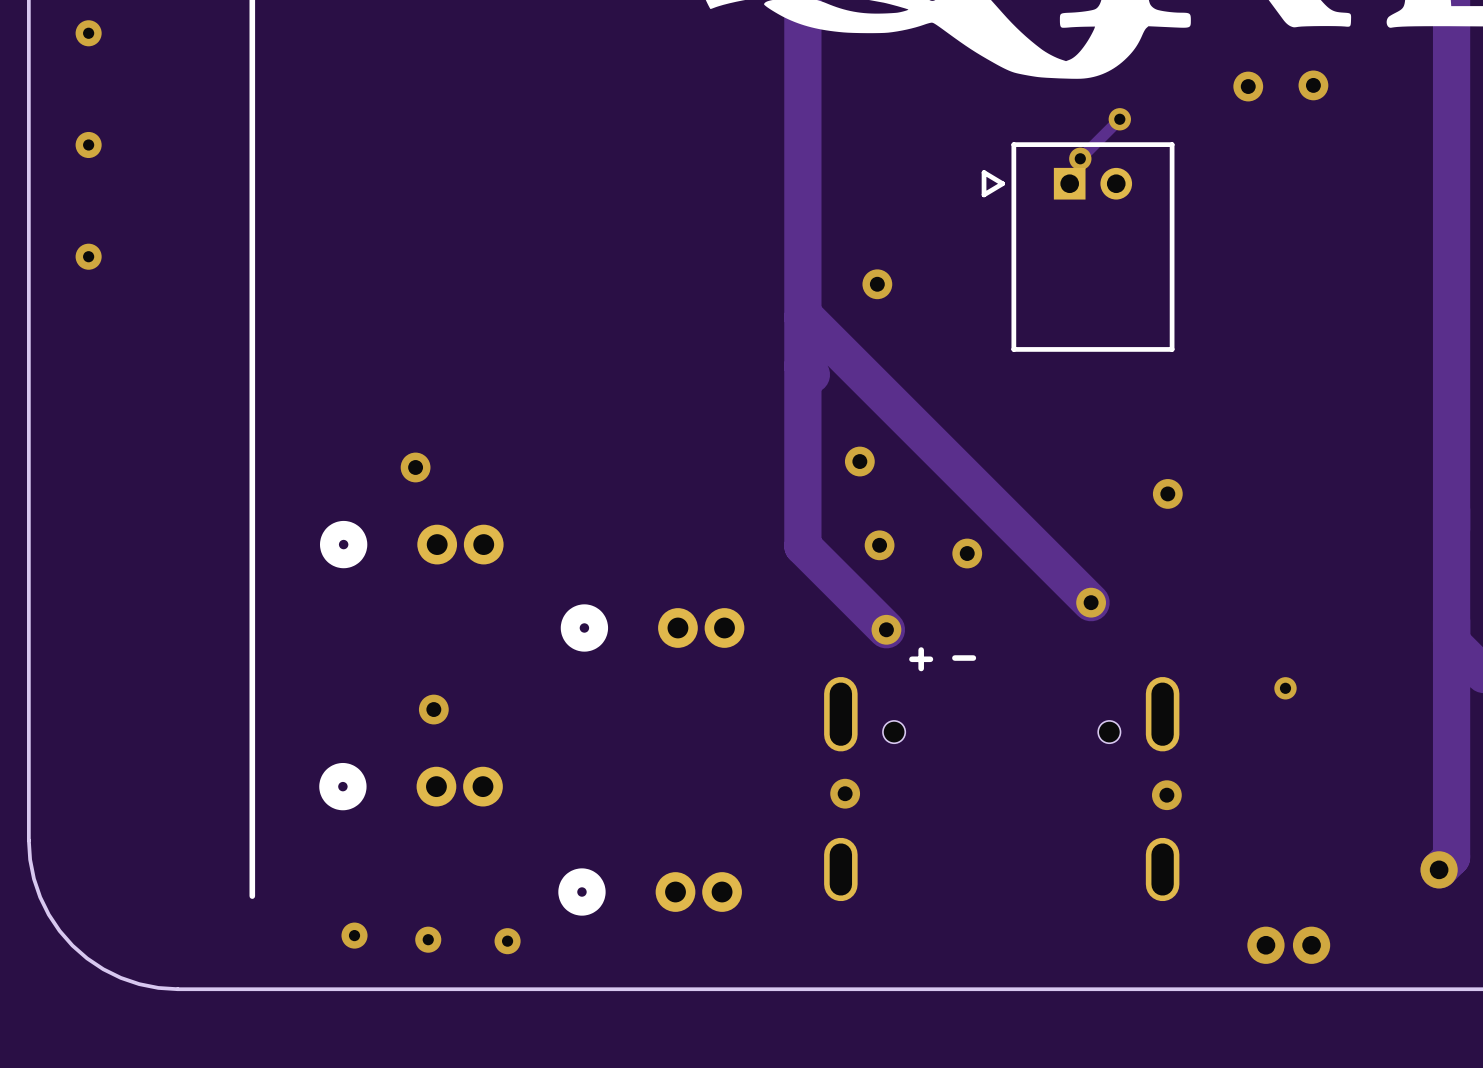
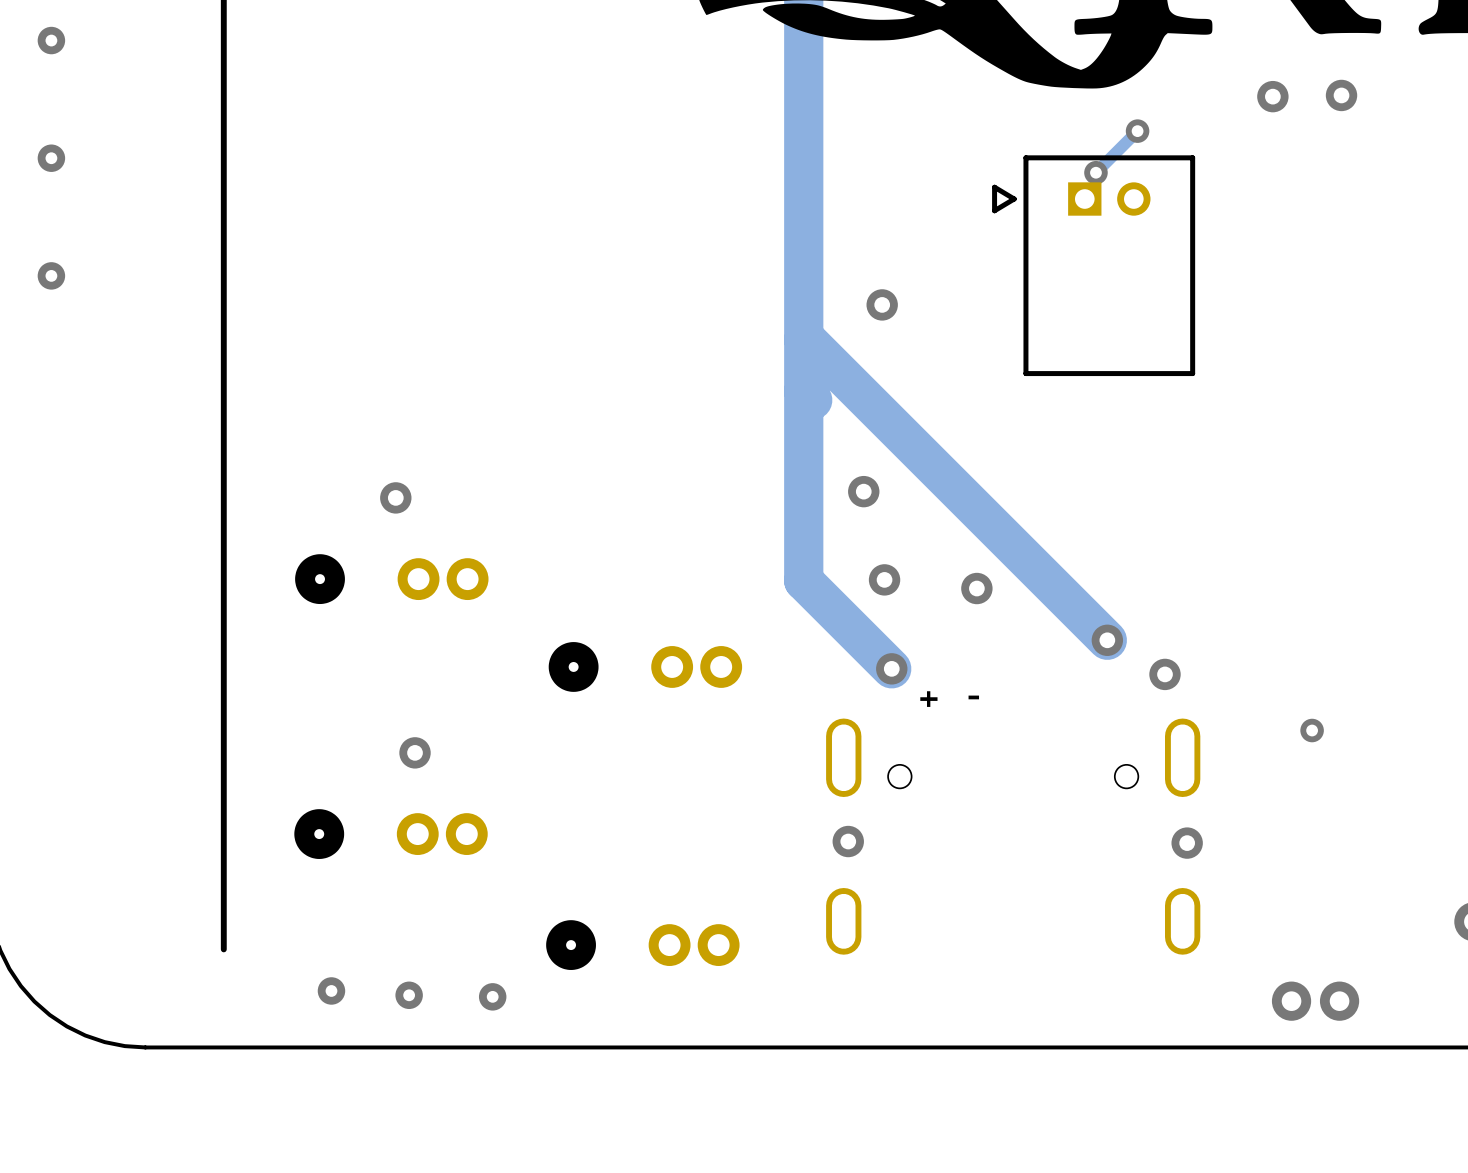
via position: (1167, 493) -> (1165, 674)

